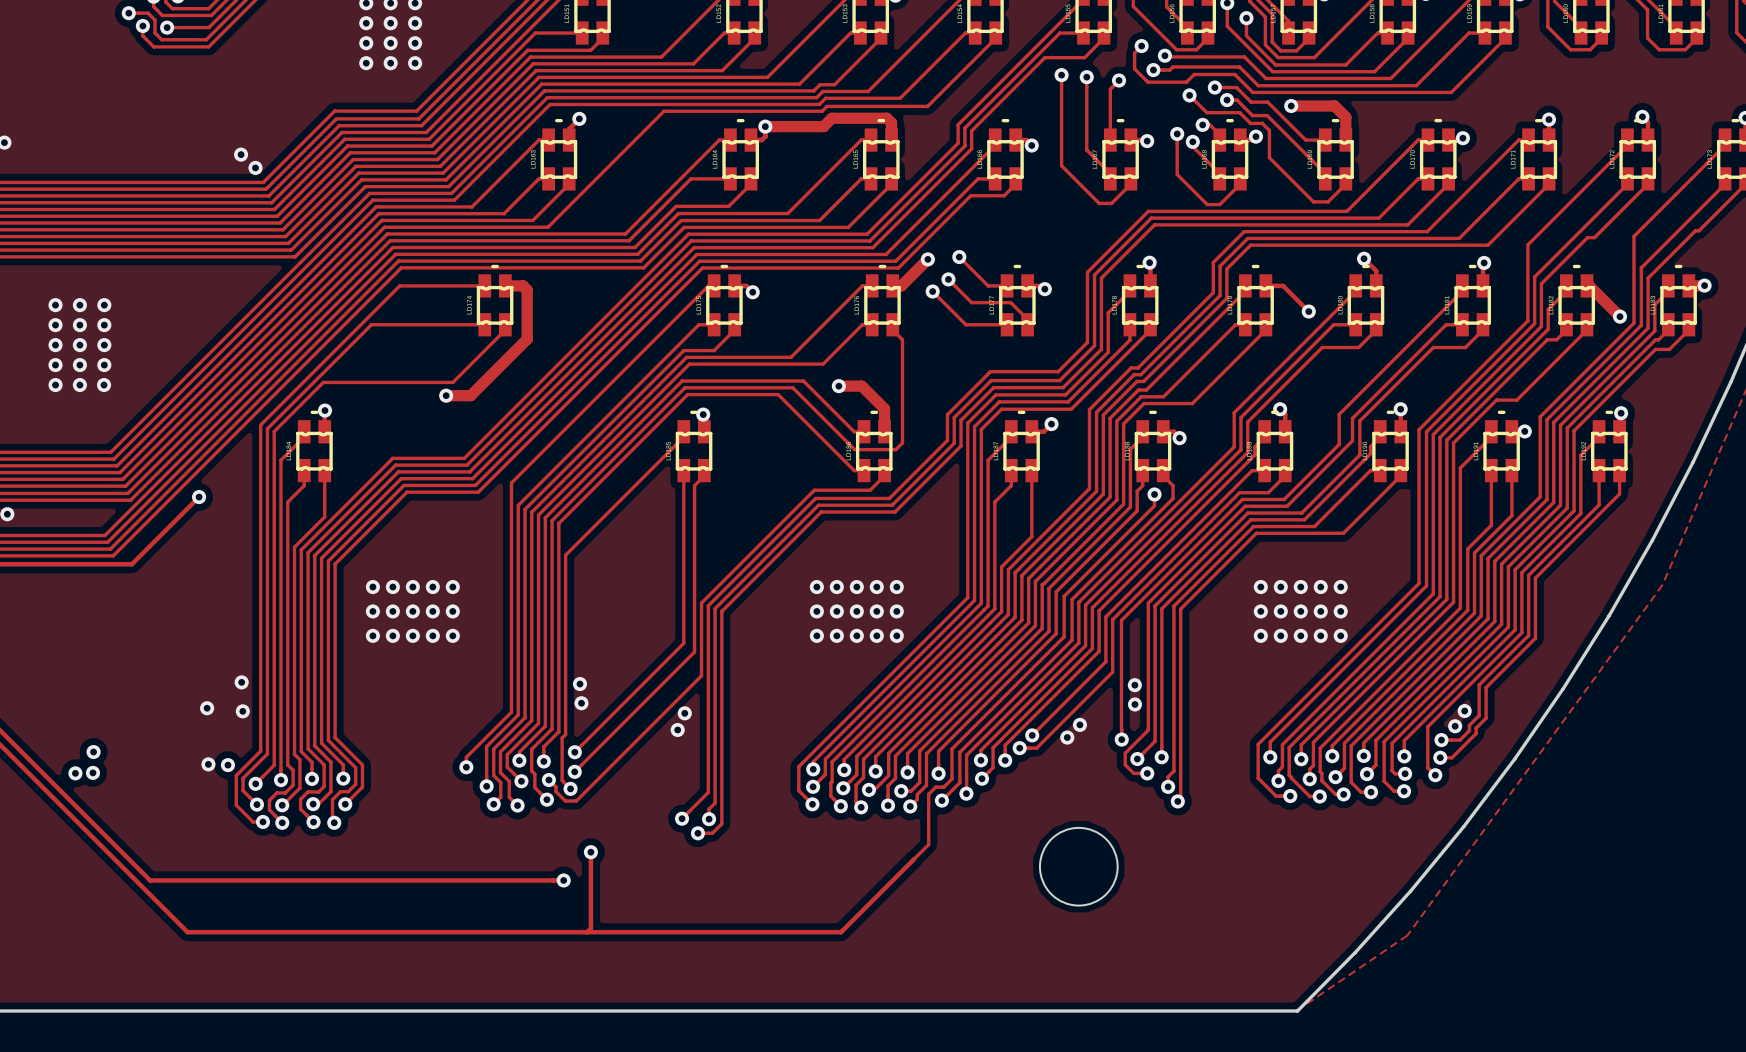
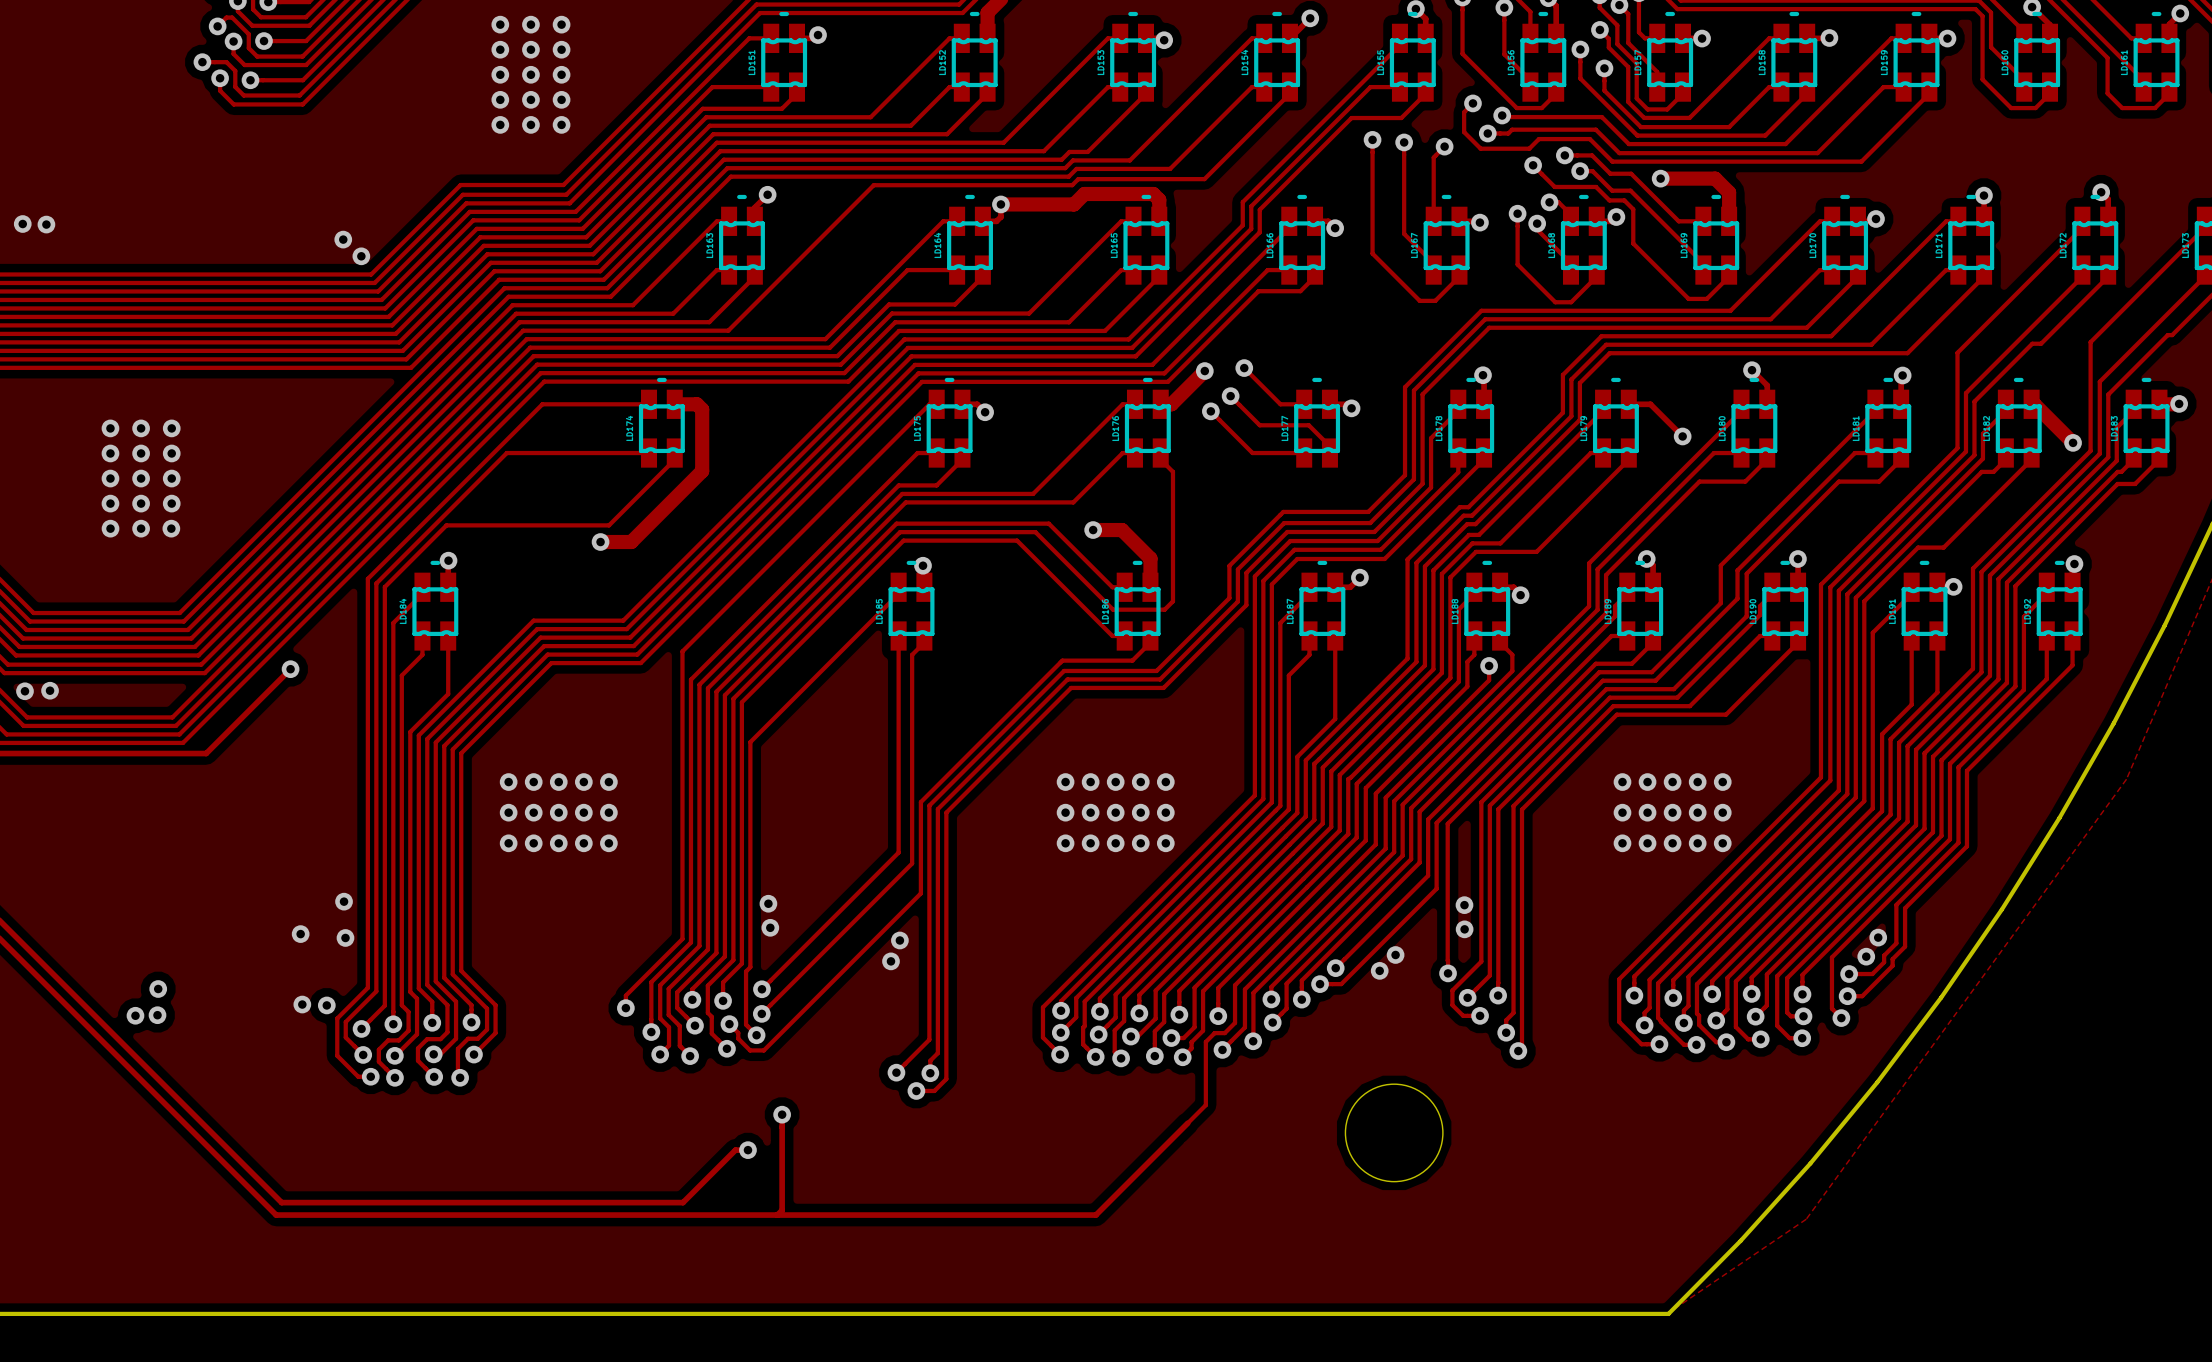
track: (150, 880) (553, 880) -> (229, 1150) (281, 1202) (683, 1202) (735, 1150)

